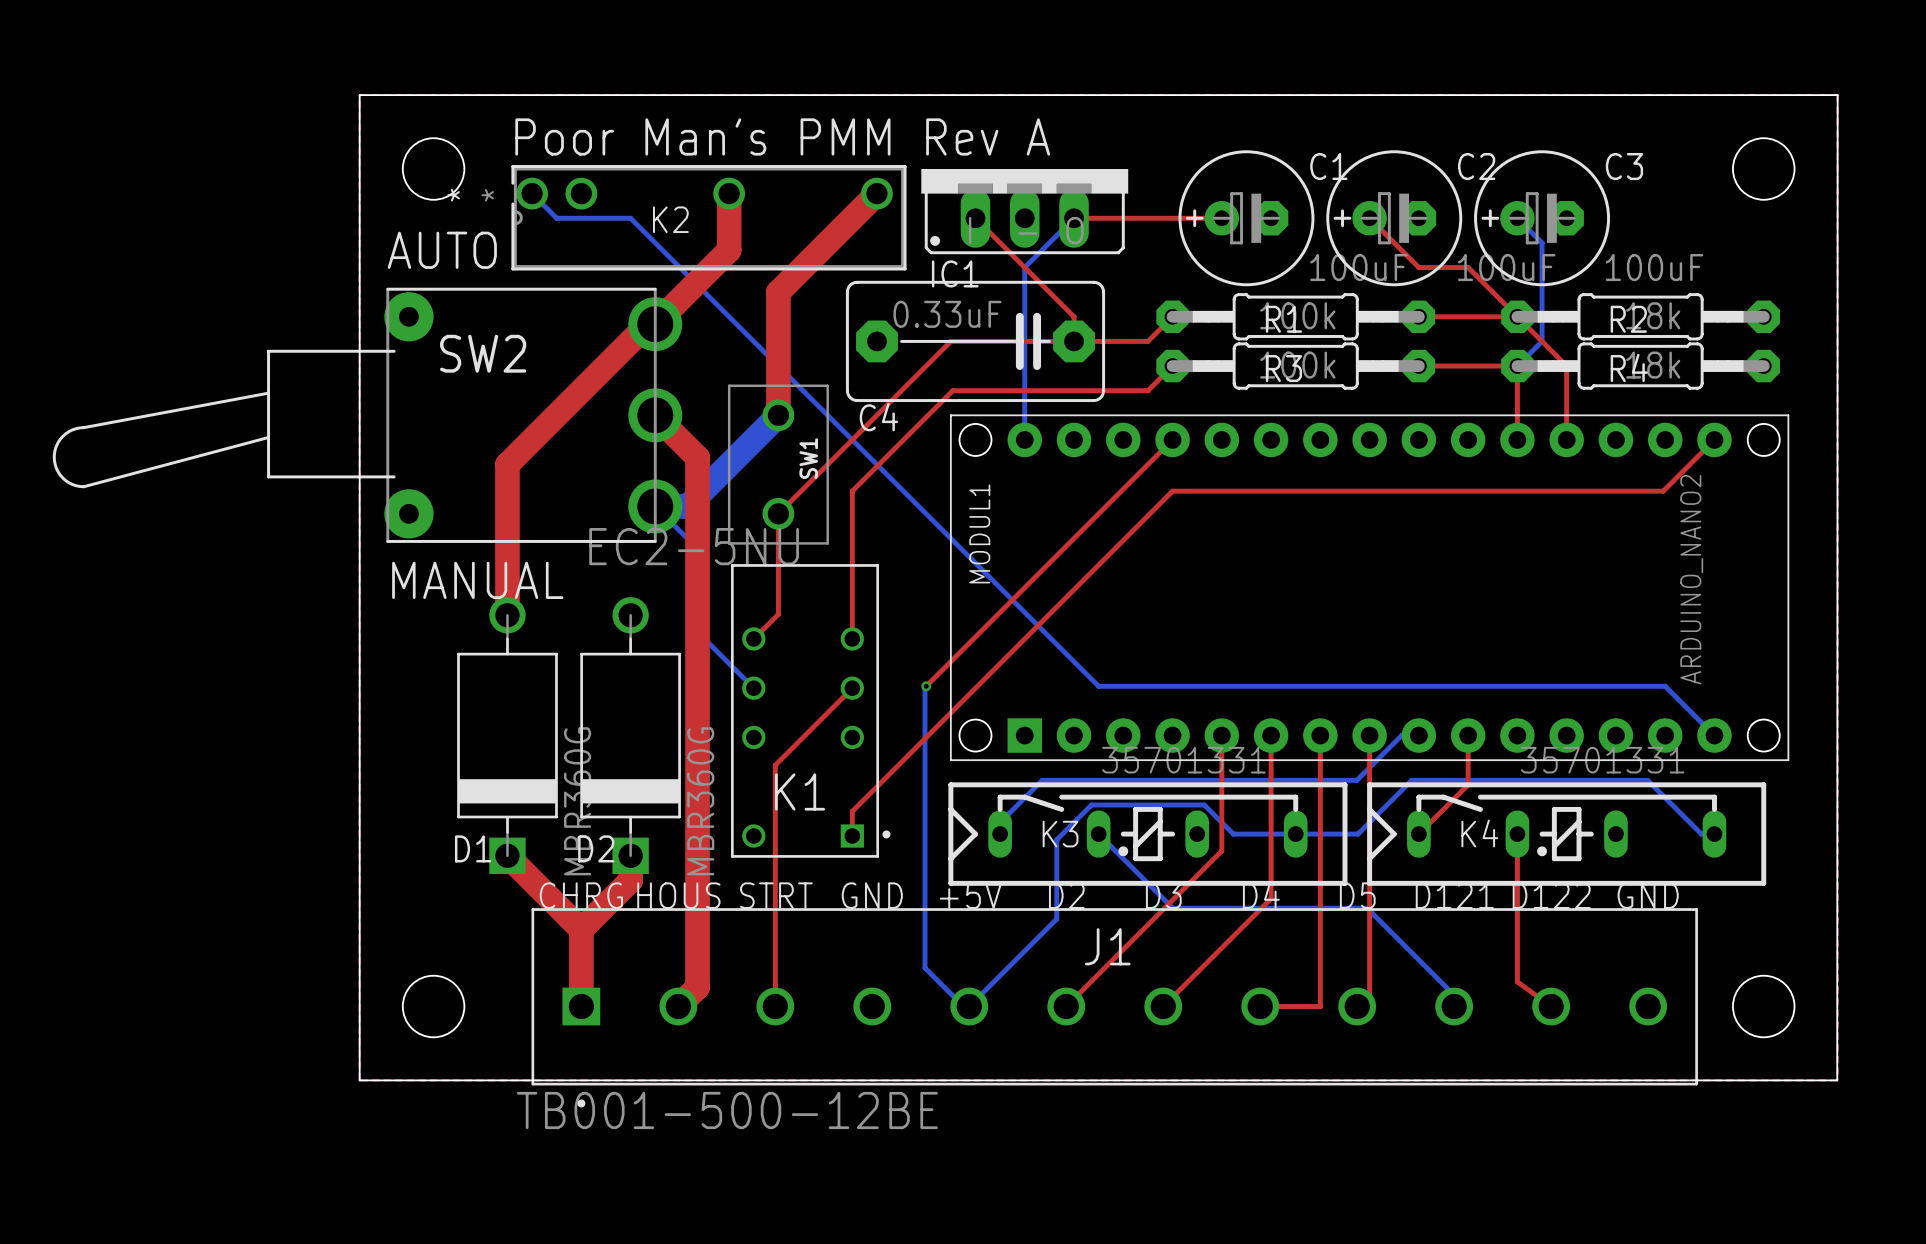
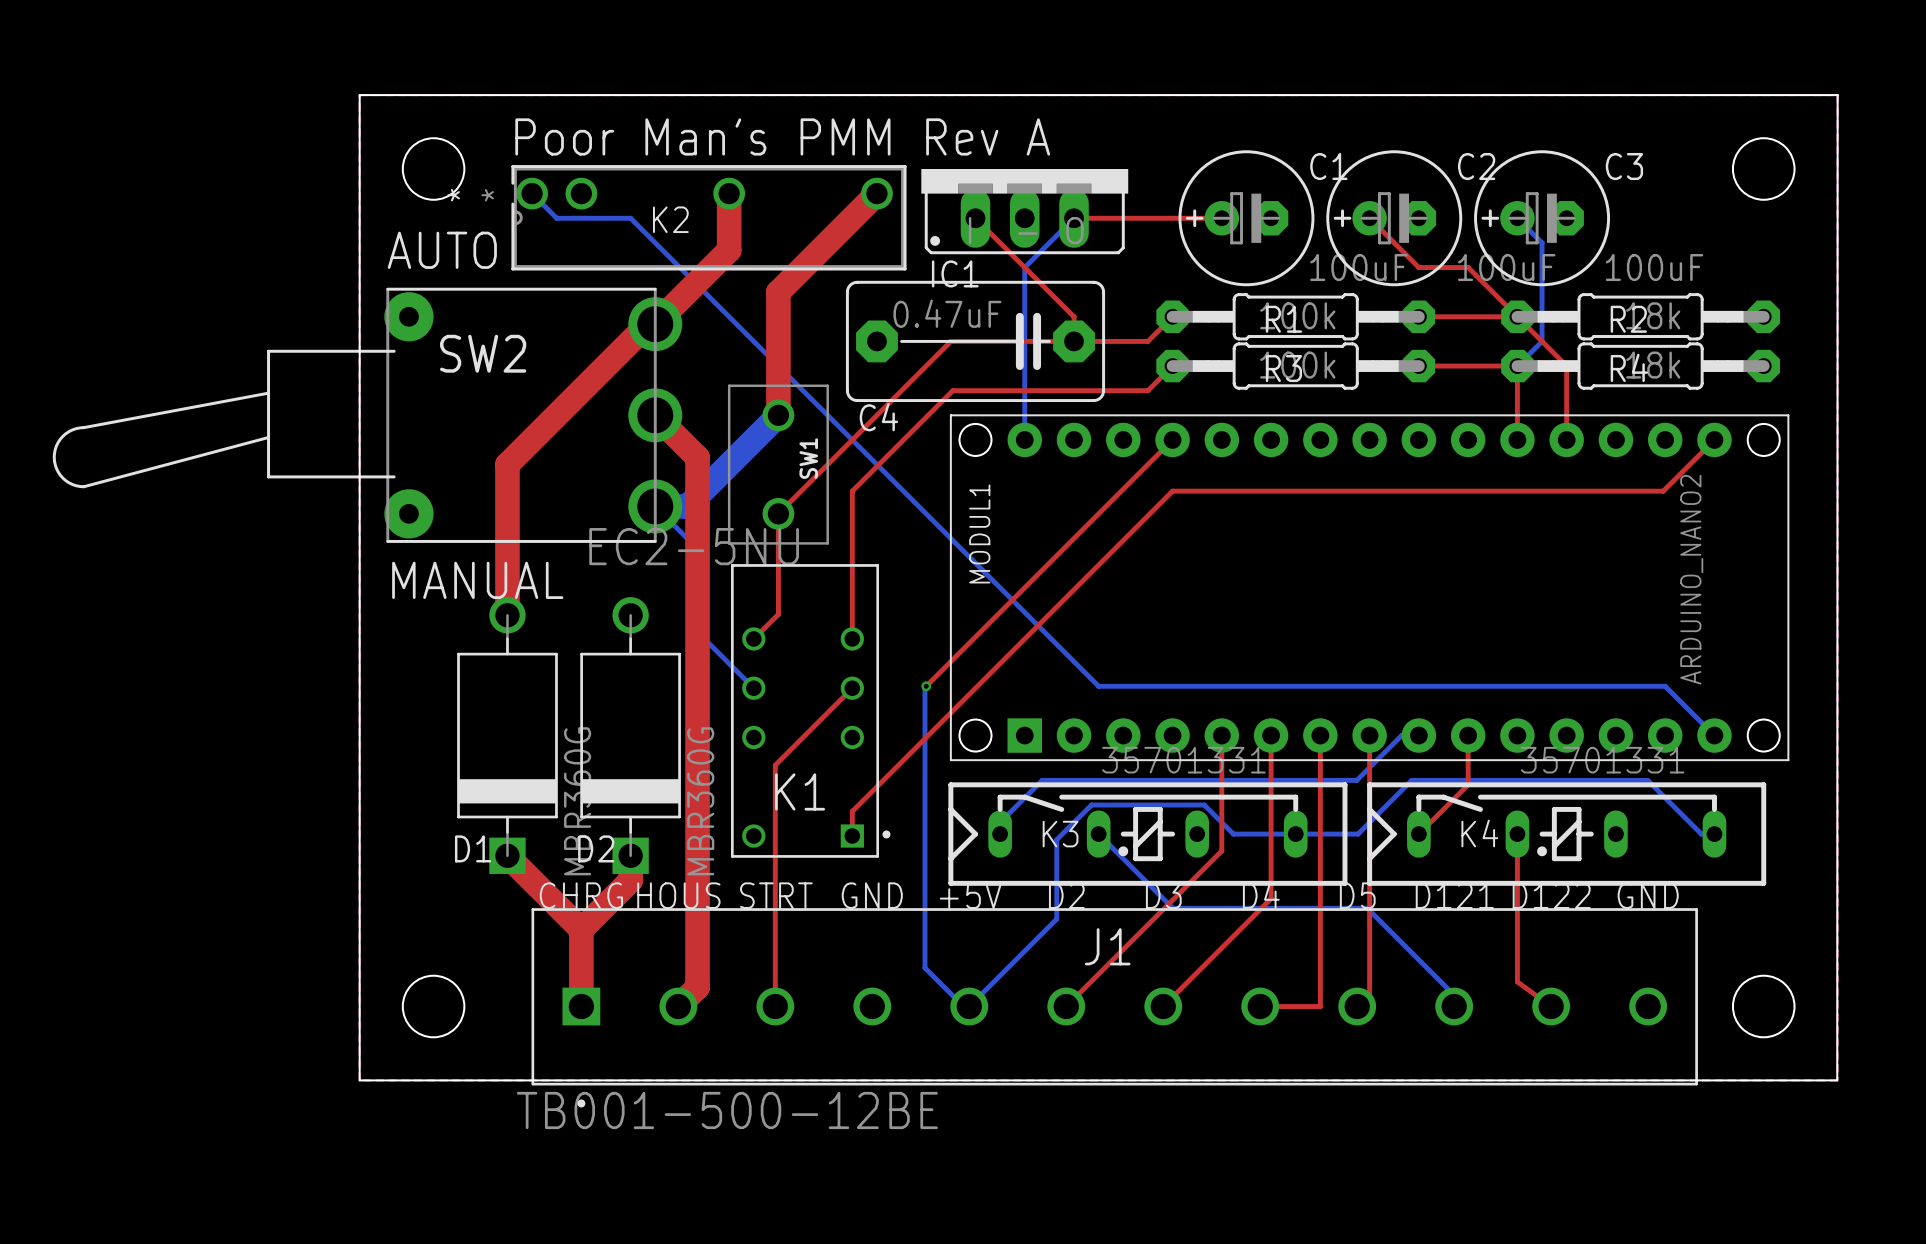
C4 value: 0.33uF (947, 314) -> 0.47uF (947, 313)

